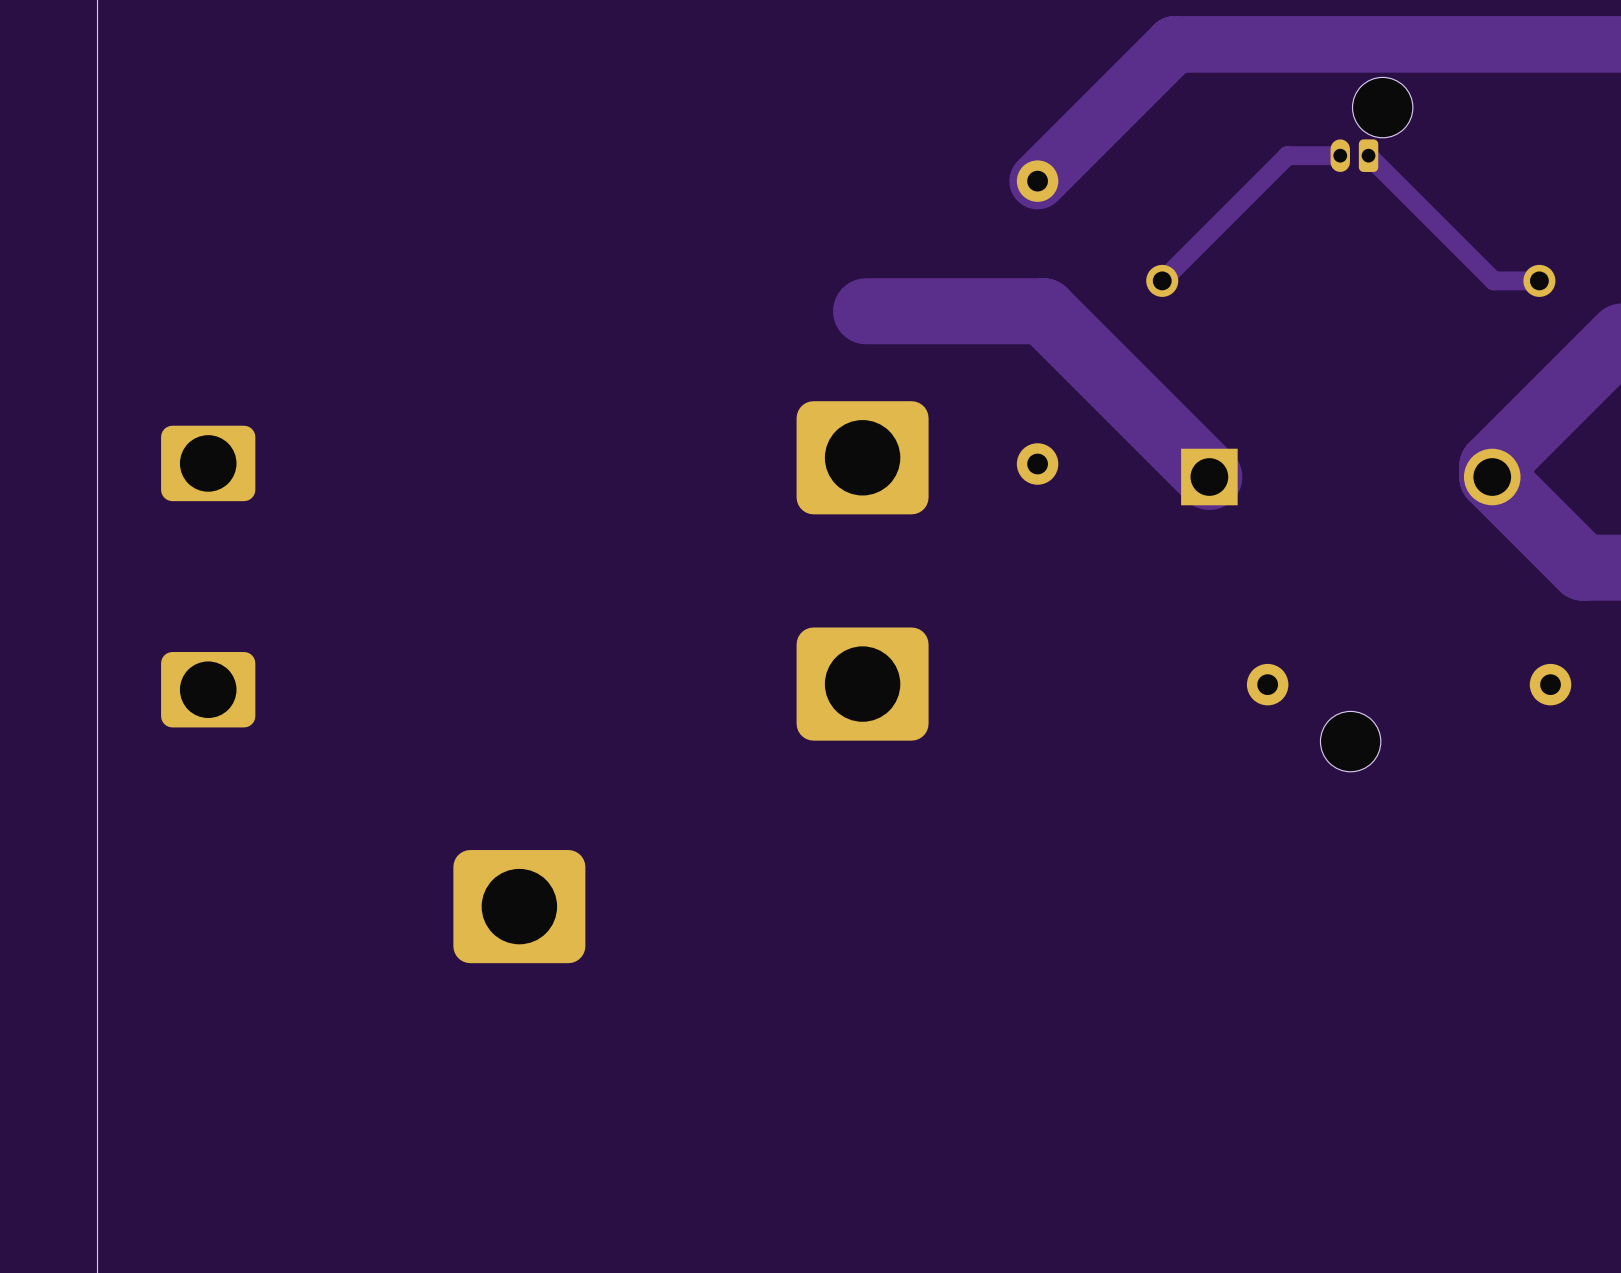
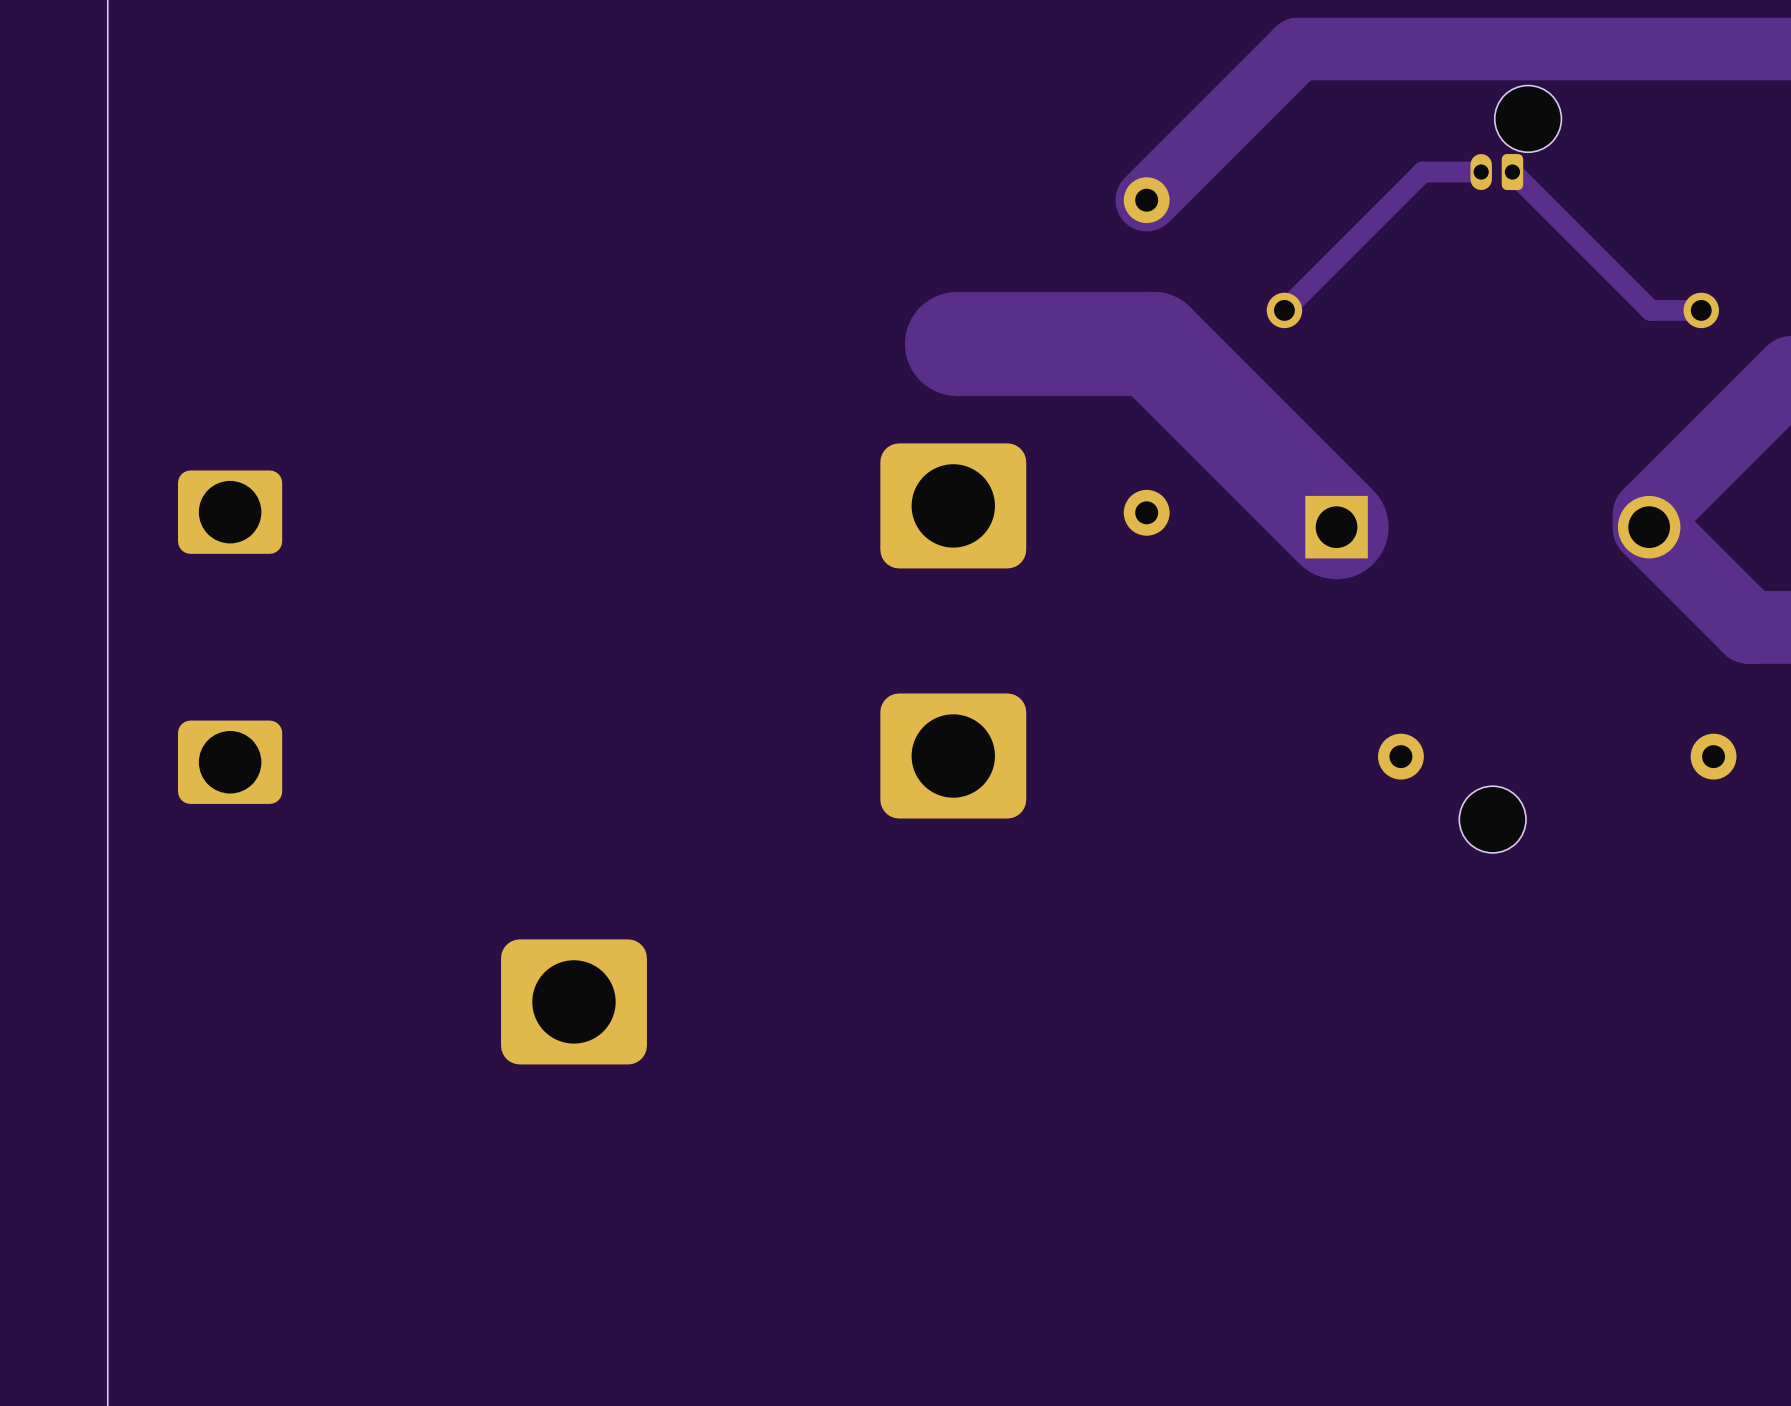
track width: thin (865, 311) (1043, 311) (1209, 477) -> thick (957, 343) (1153, 343) (1336, 527)

